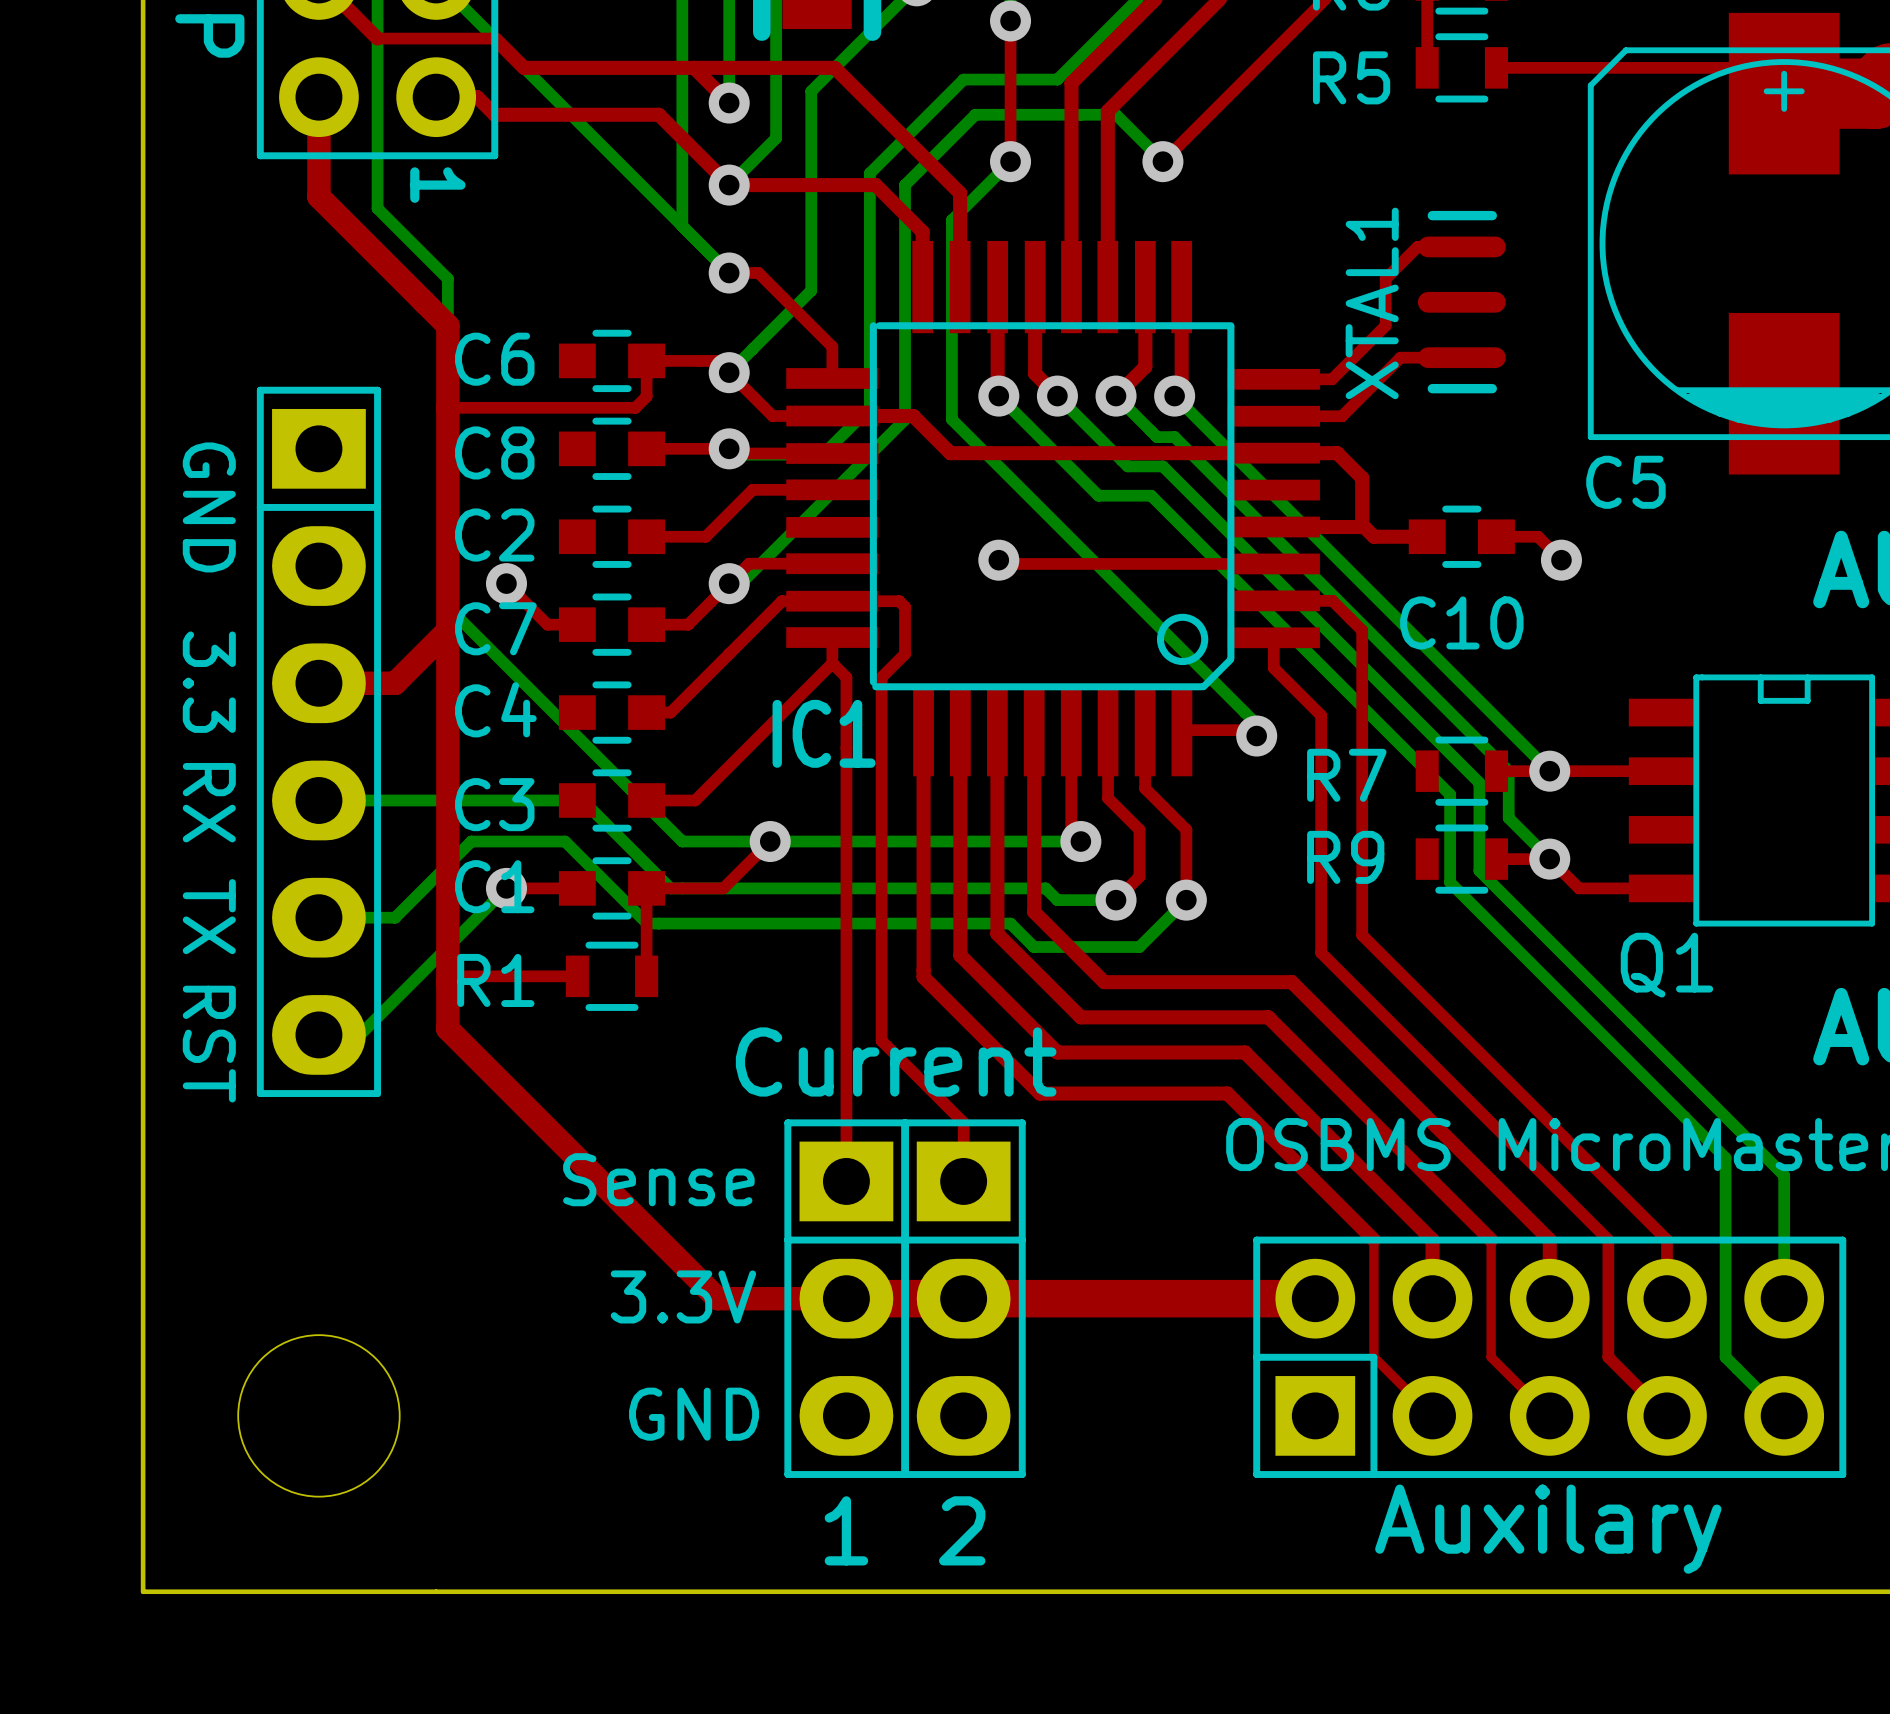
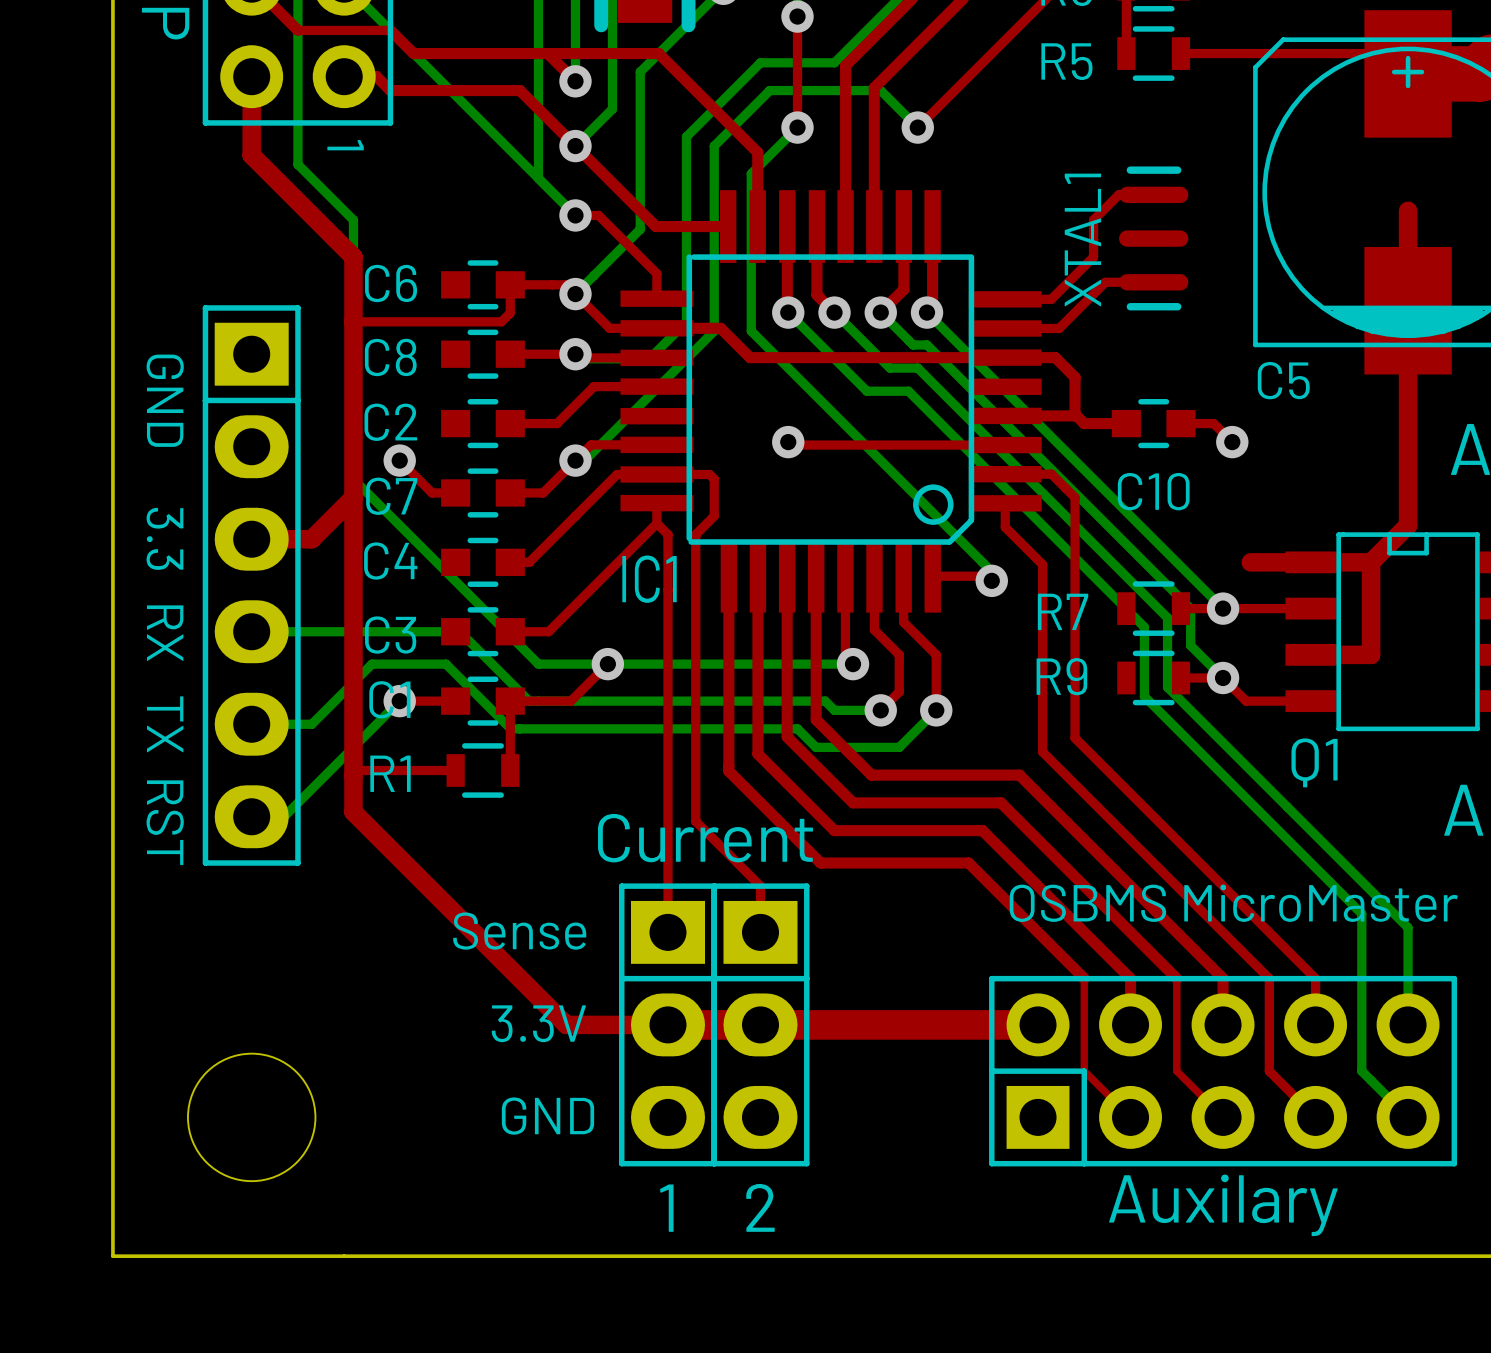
top track: (729, 185) (875, 185) (922, 231) (922, 287) -> (575, 146) (655, 226) (728, 226)
top track: none -> (1408, 210) (1408, 525) (1371, 562)
top track: none -> (1250, 562) (1371, 562)
top track: none -> (1371, 562) (1371, 654) (1310, 654)

